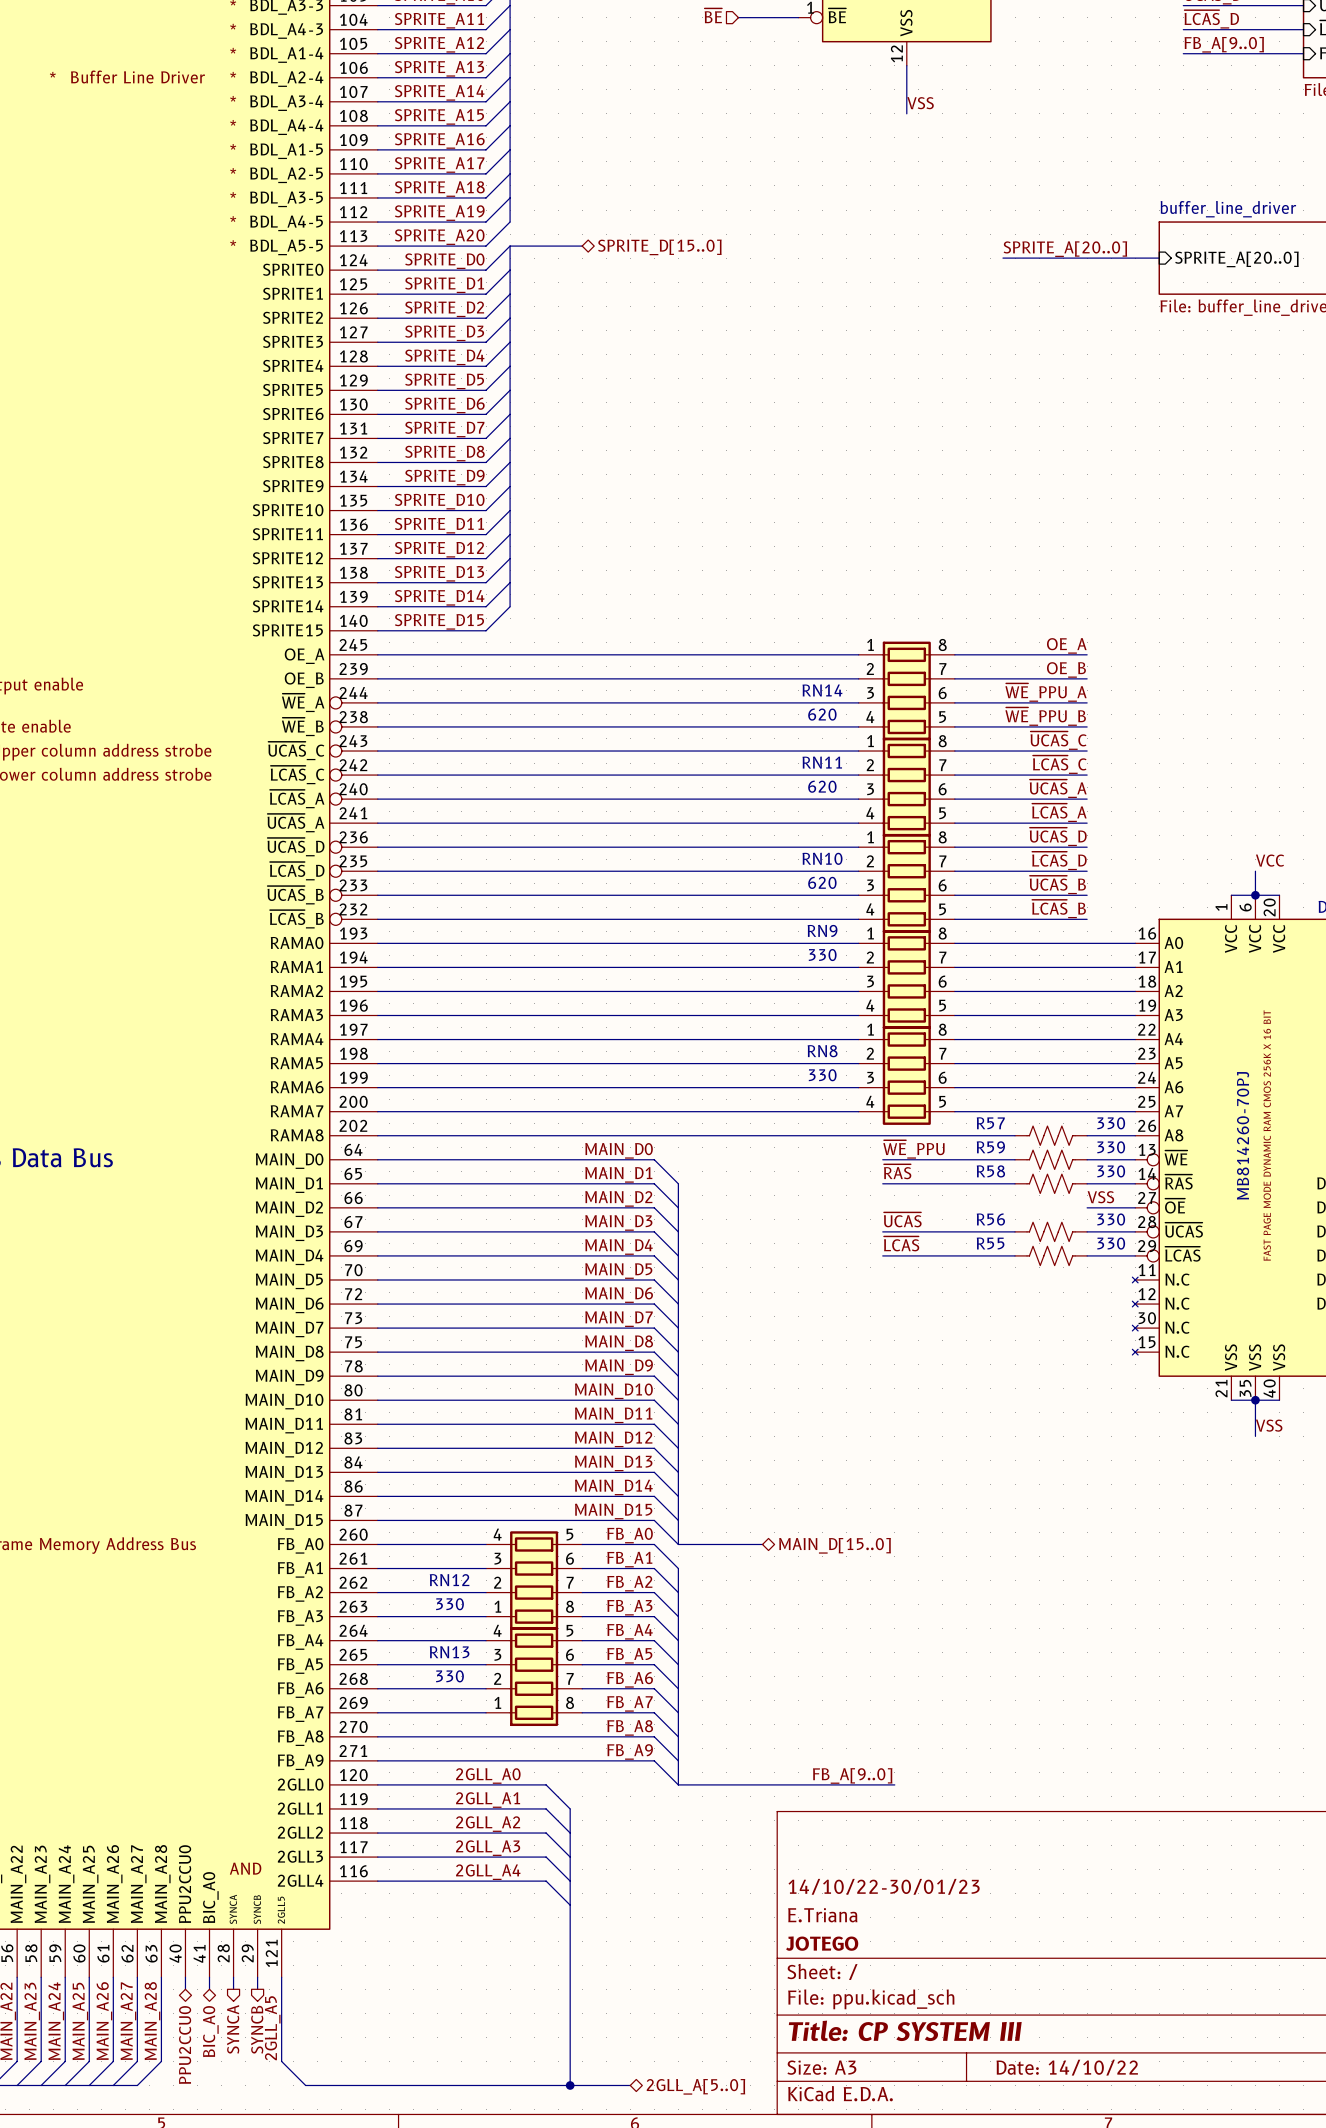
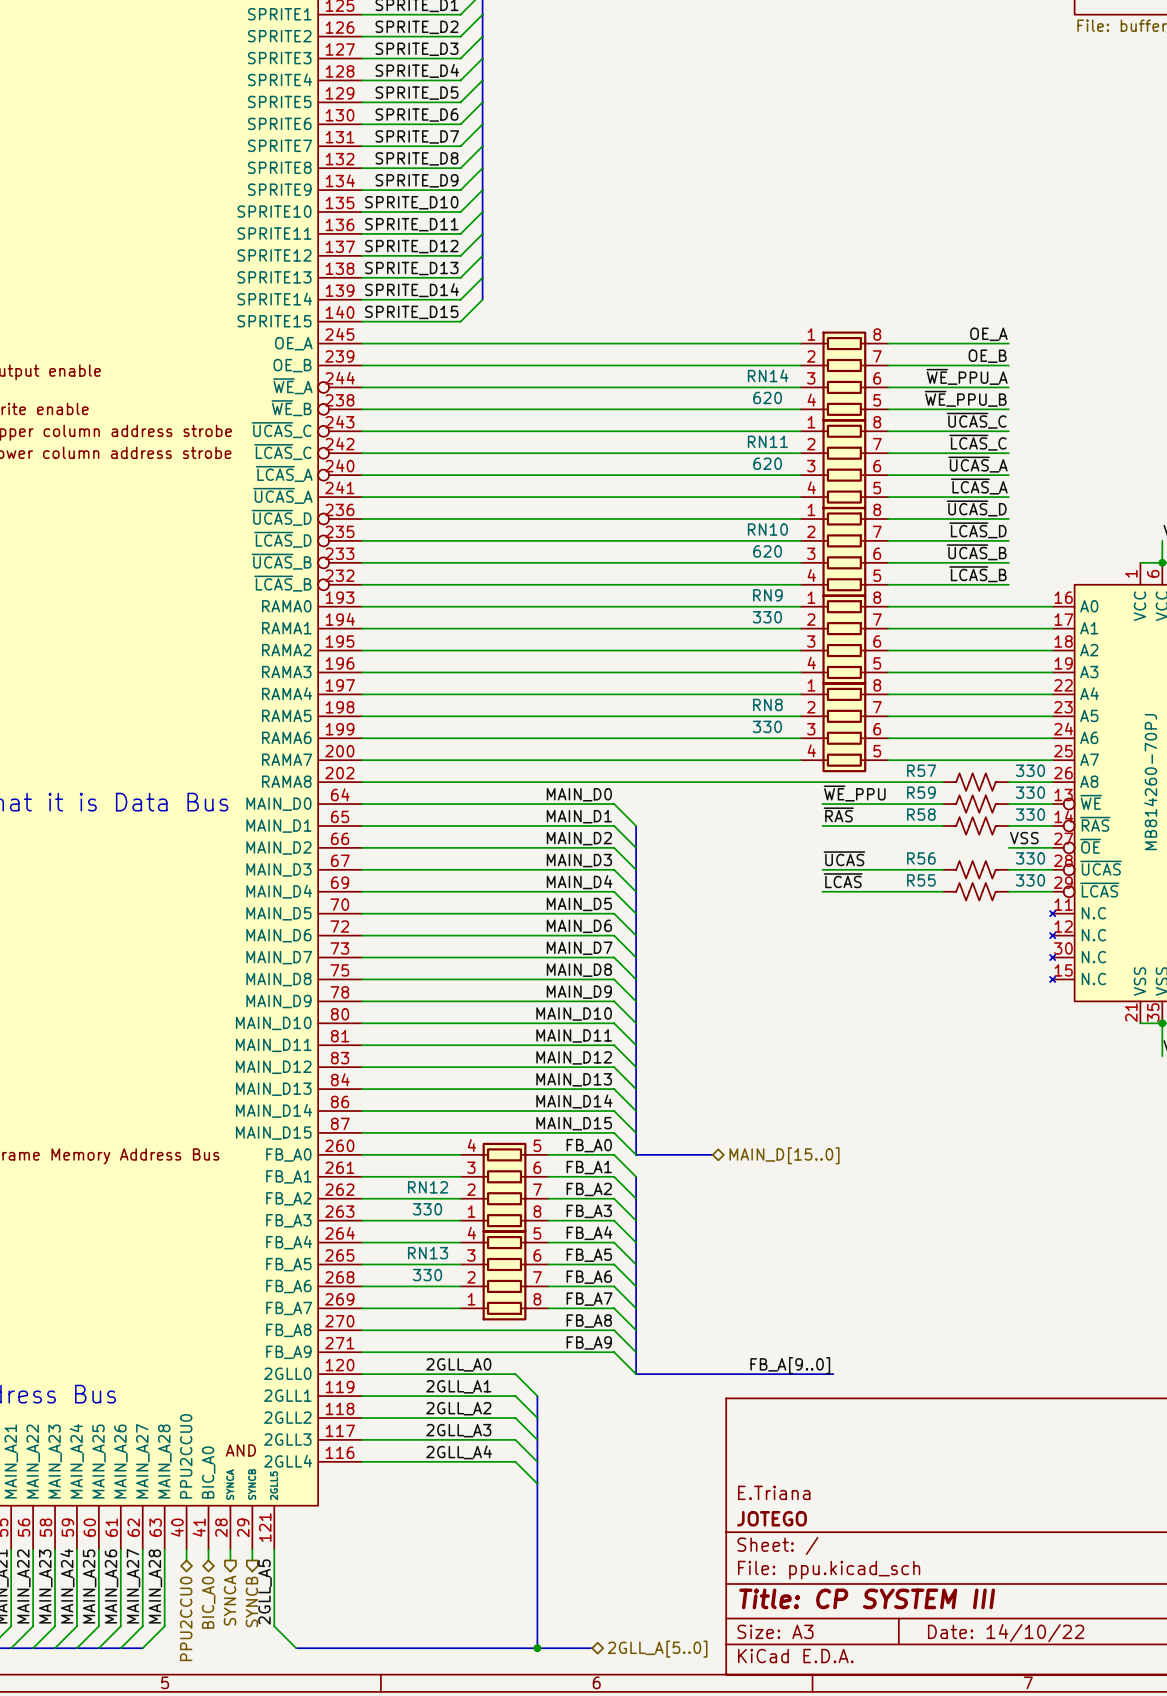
title block: 14/10/22-30/01/23 (884, 1886) -> none

